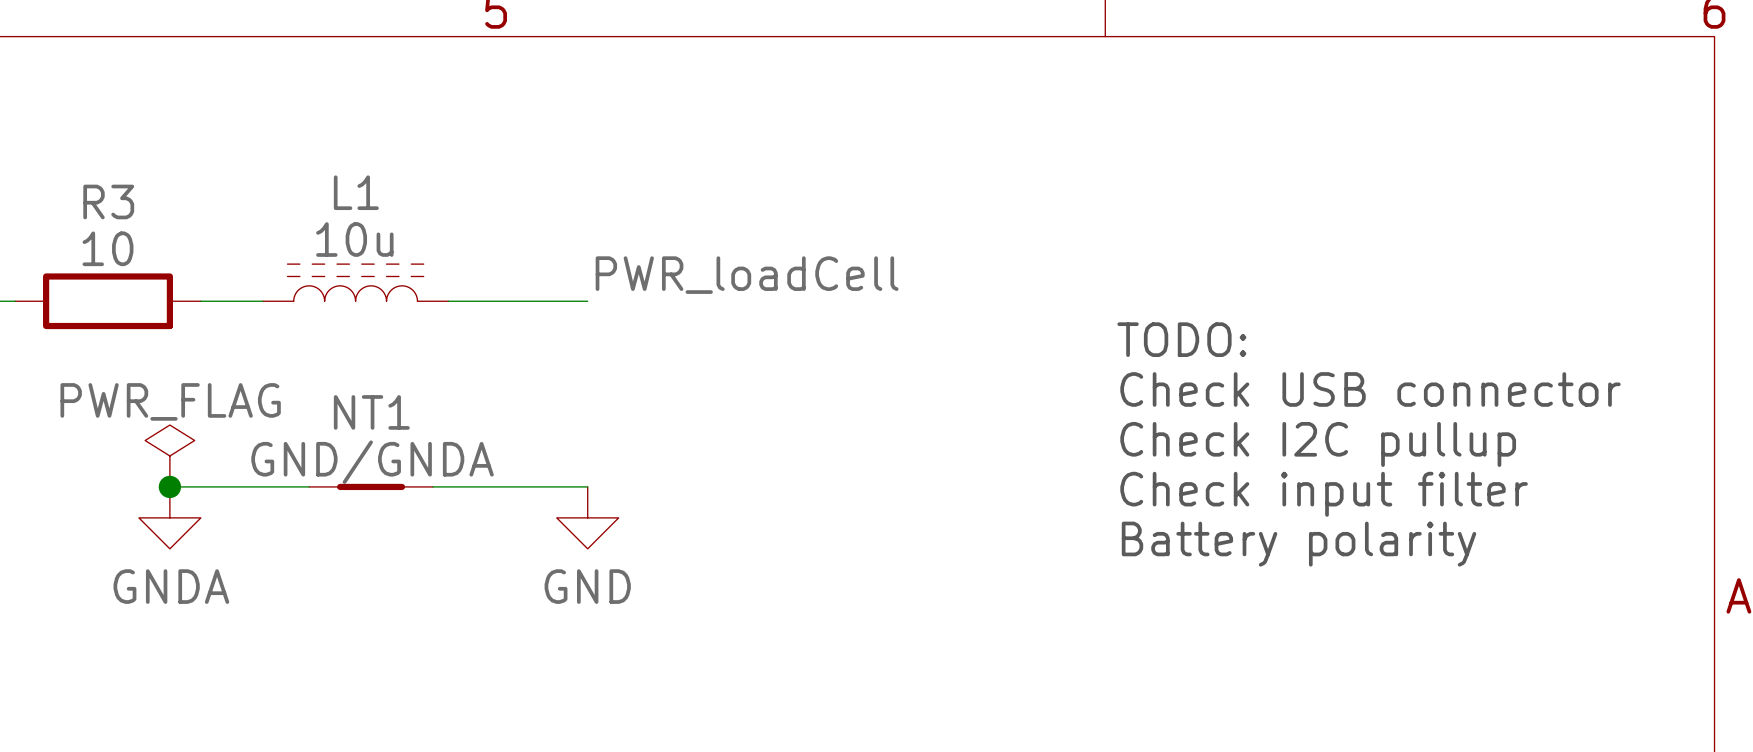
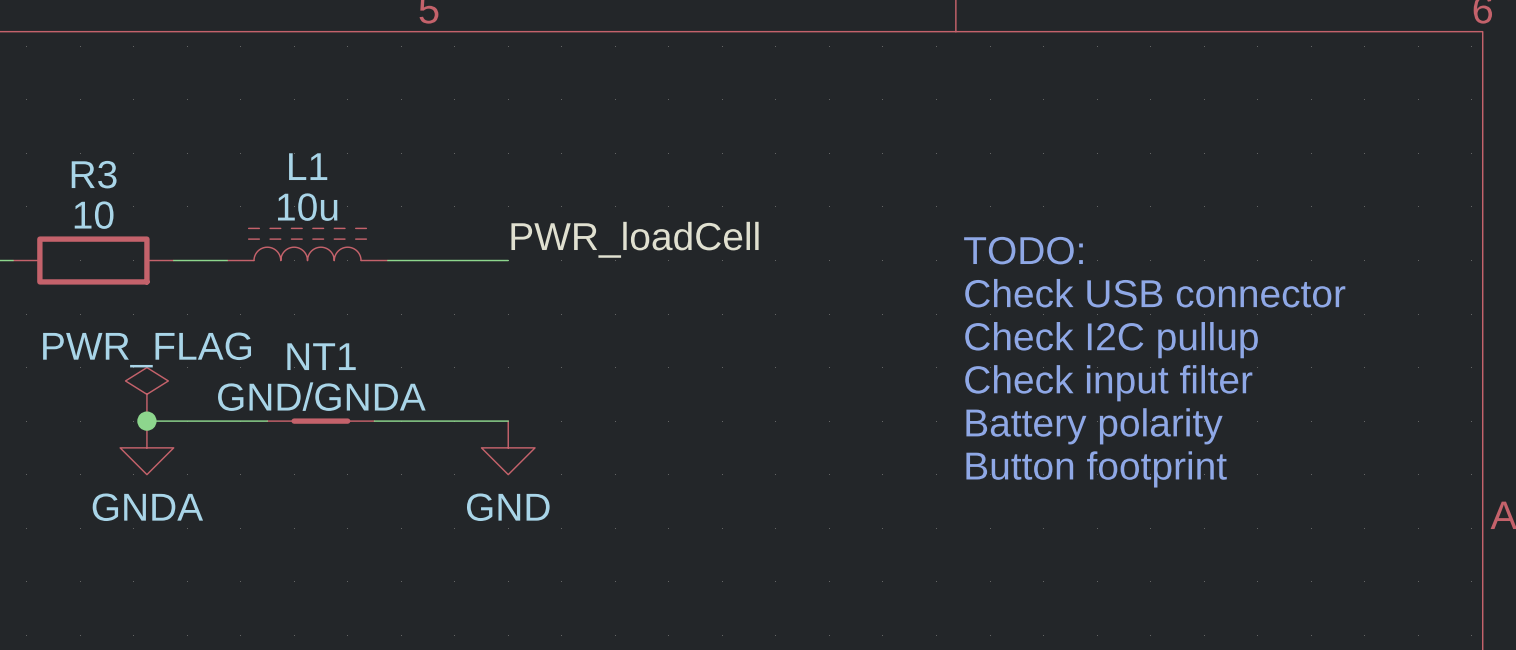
text: none -> TODO: (1023, 250)
text: TODO: (1181, 339) -> Check USB connector (1155, 293)
text: Check USB connector (1370, 389) -> Check I2C pullup (1111, 340)
text: Check I2C pullup (1318, 444) -> Check input filter (1108, 383)
text: Check input filter (1324, 494) -> Battery polarity (1094, 426)
text: Battery polarity (1299, 544) -> Button footprint (1096, 469)

